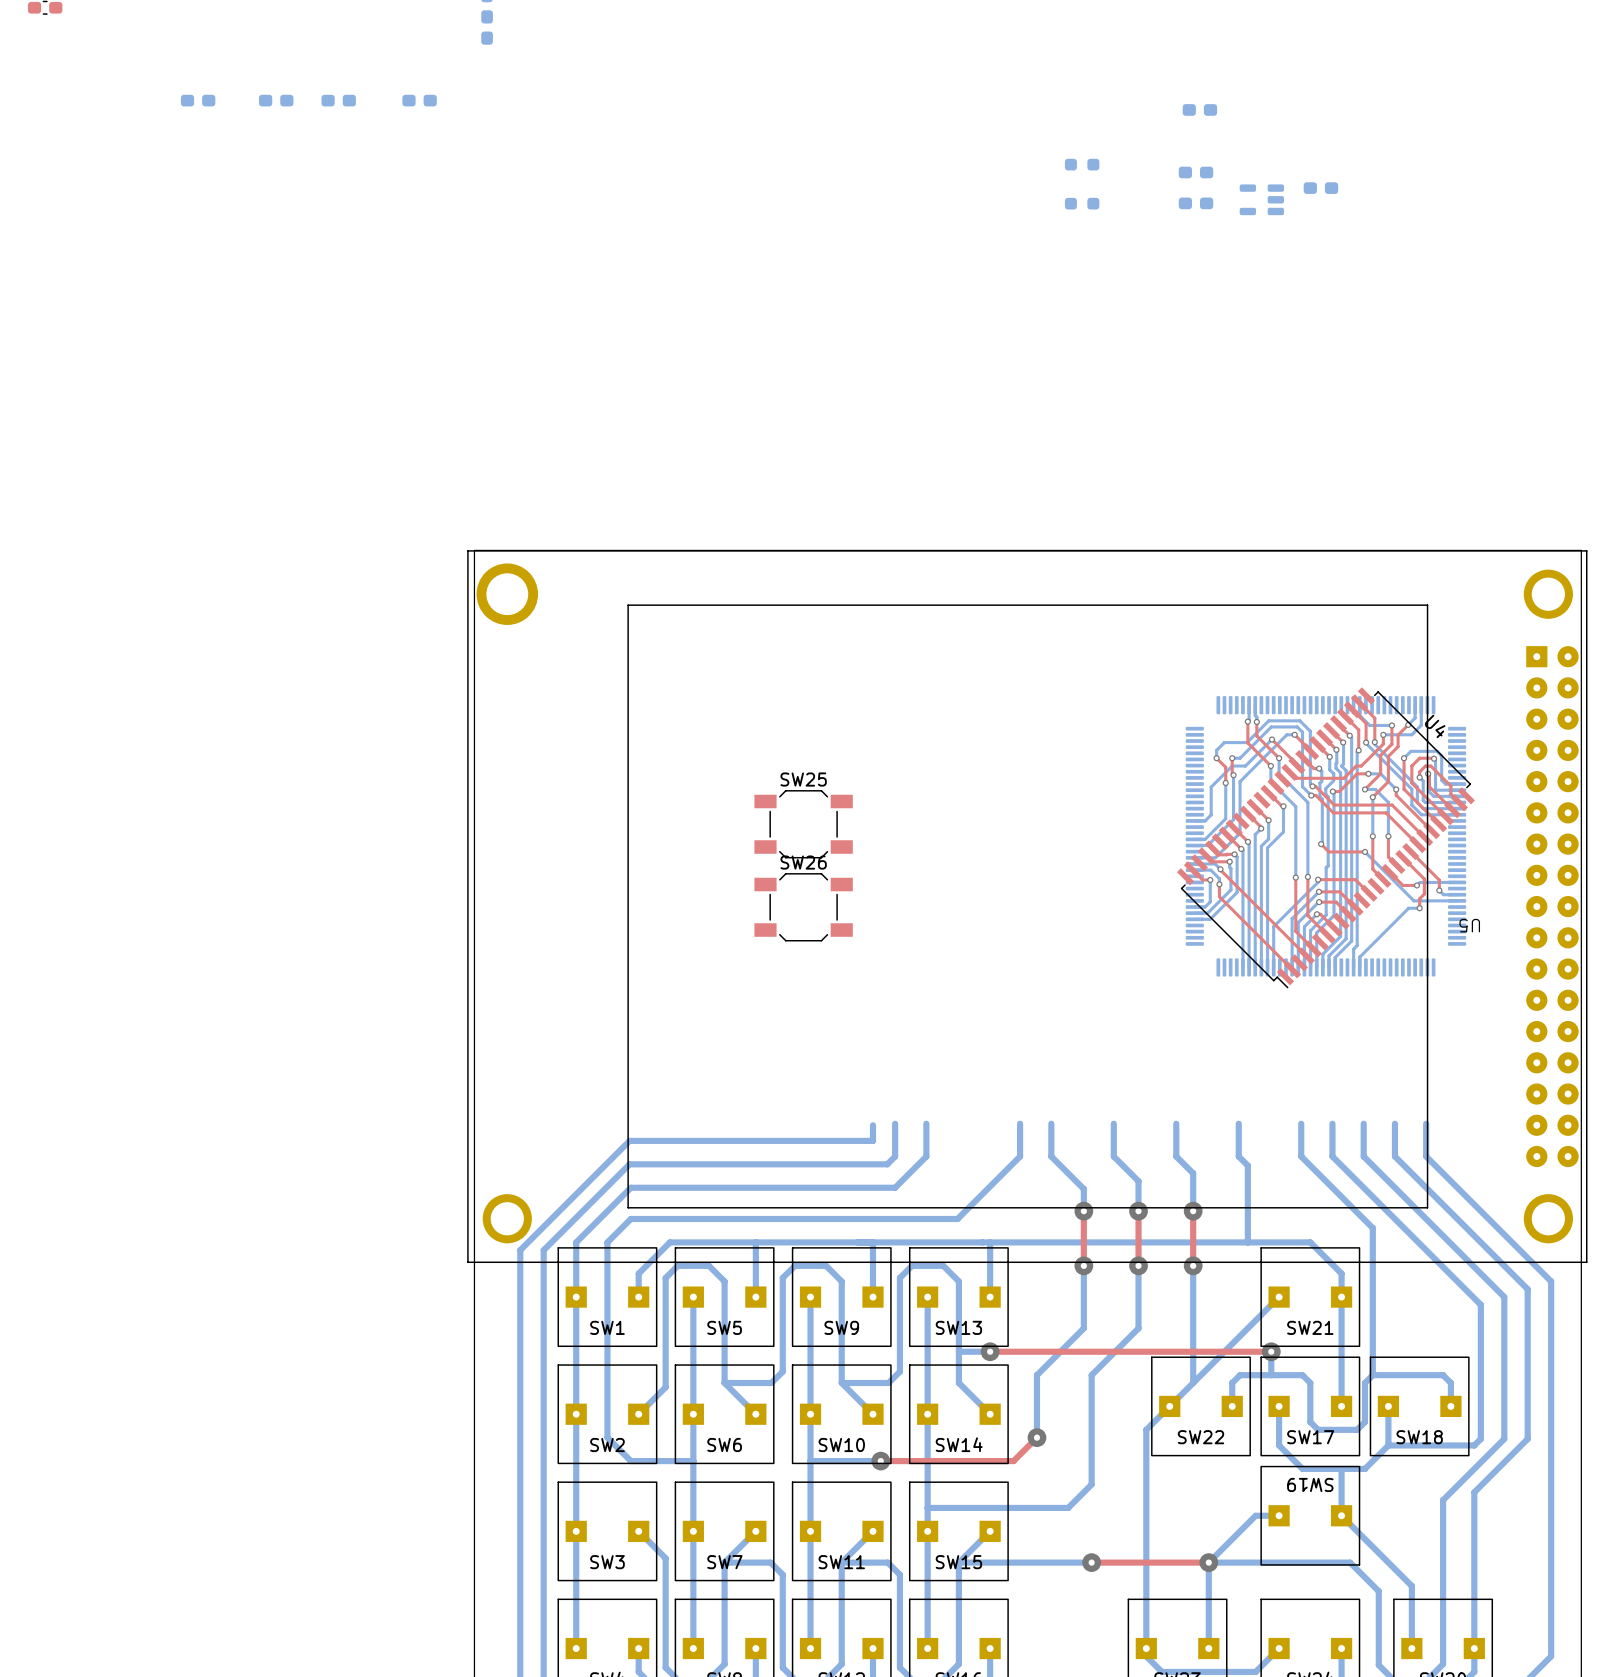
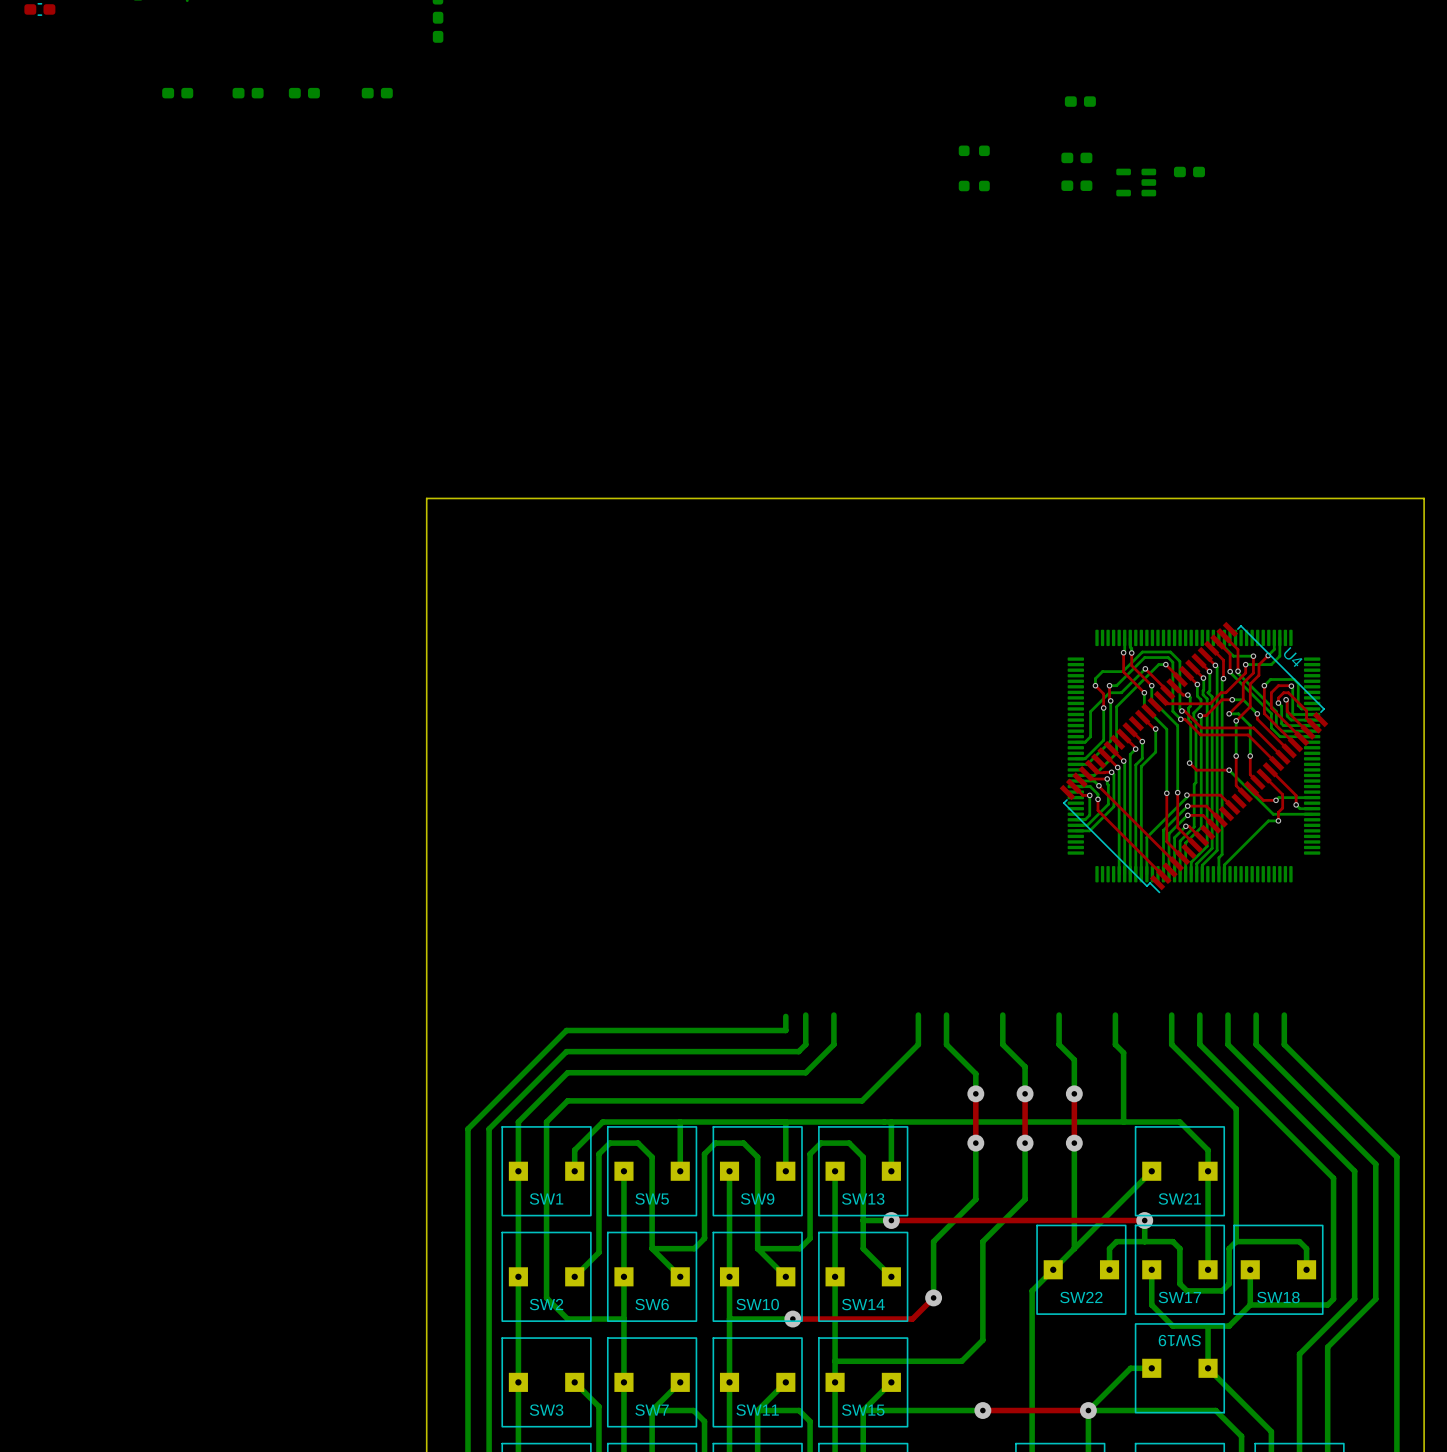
SW25: (803, 824) -> none
U5: (1027, 906) -> none
SW26: (803, 907) -> none

